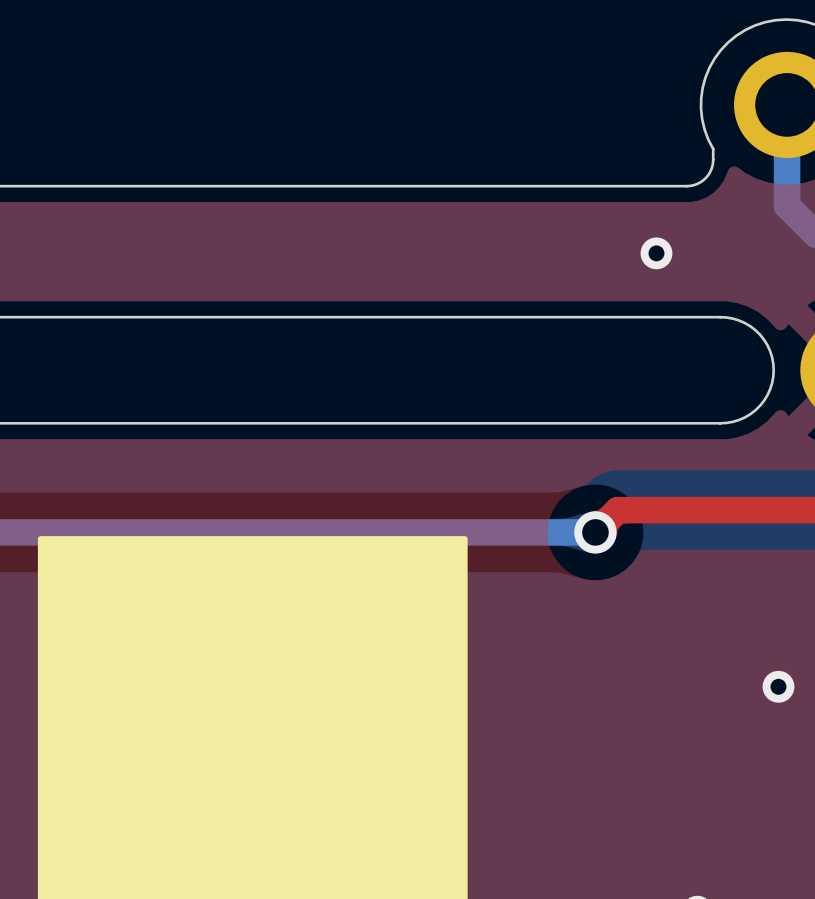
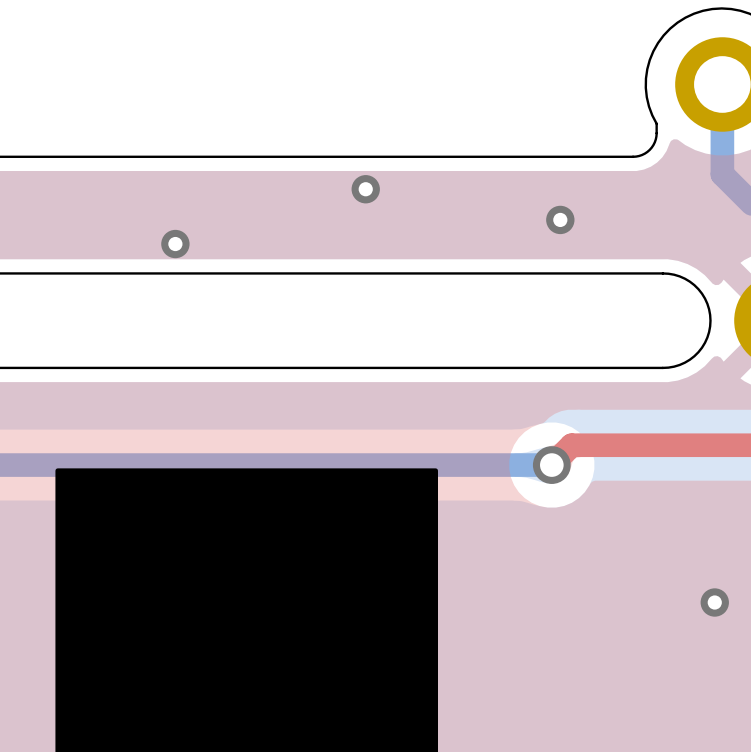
via: none -> (365, 189)
via position: (656, 253) -> (560, 219)
via: none -> (175, 244)

